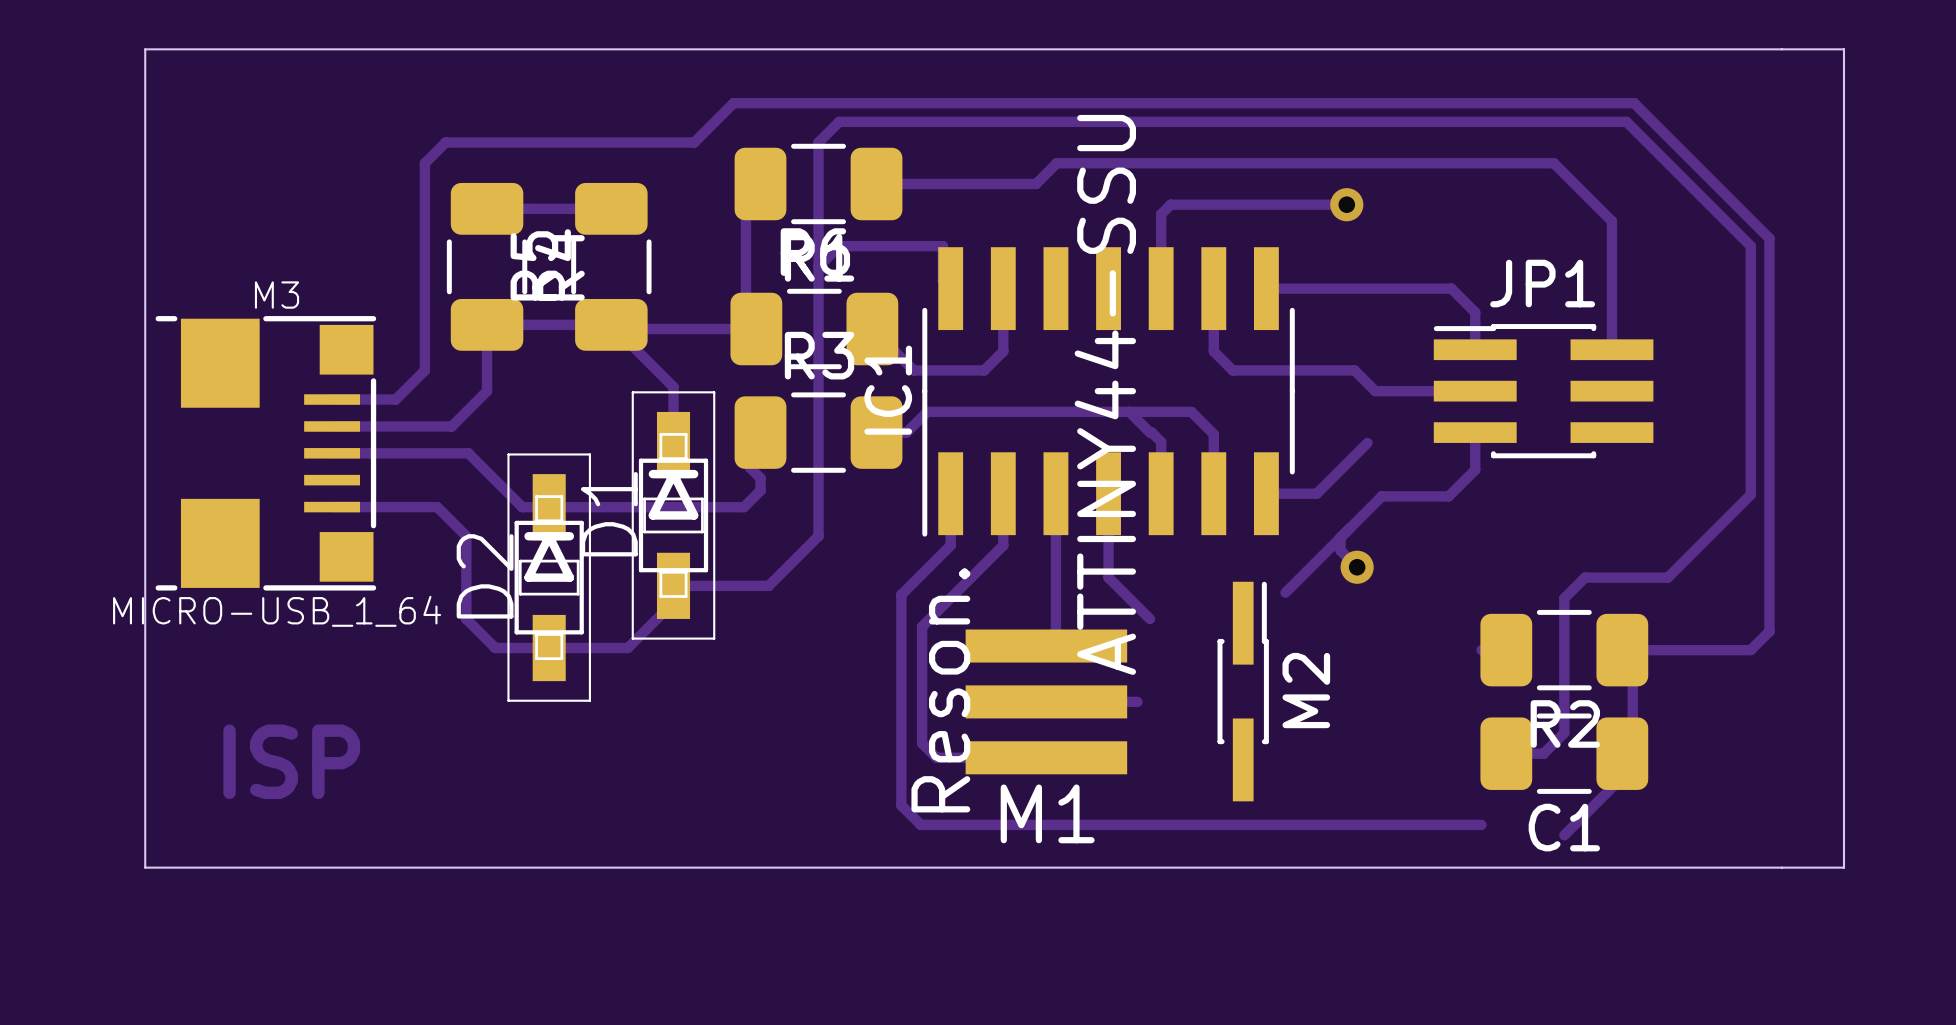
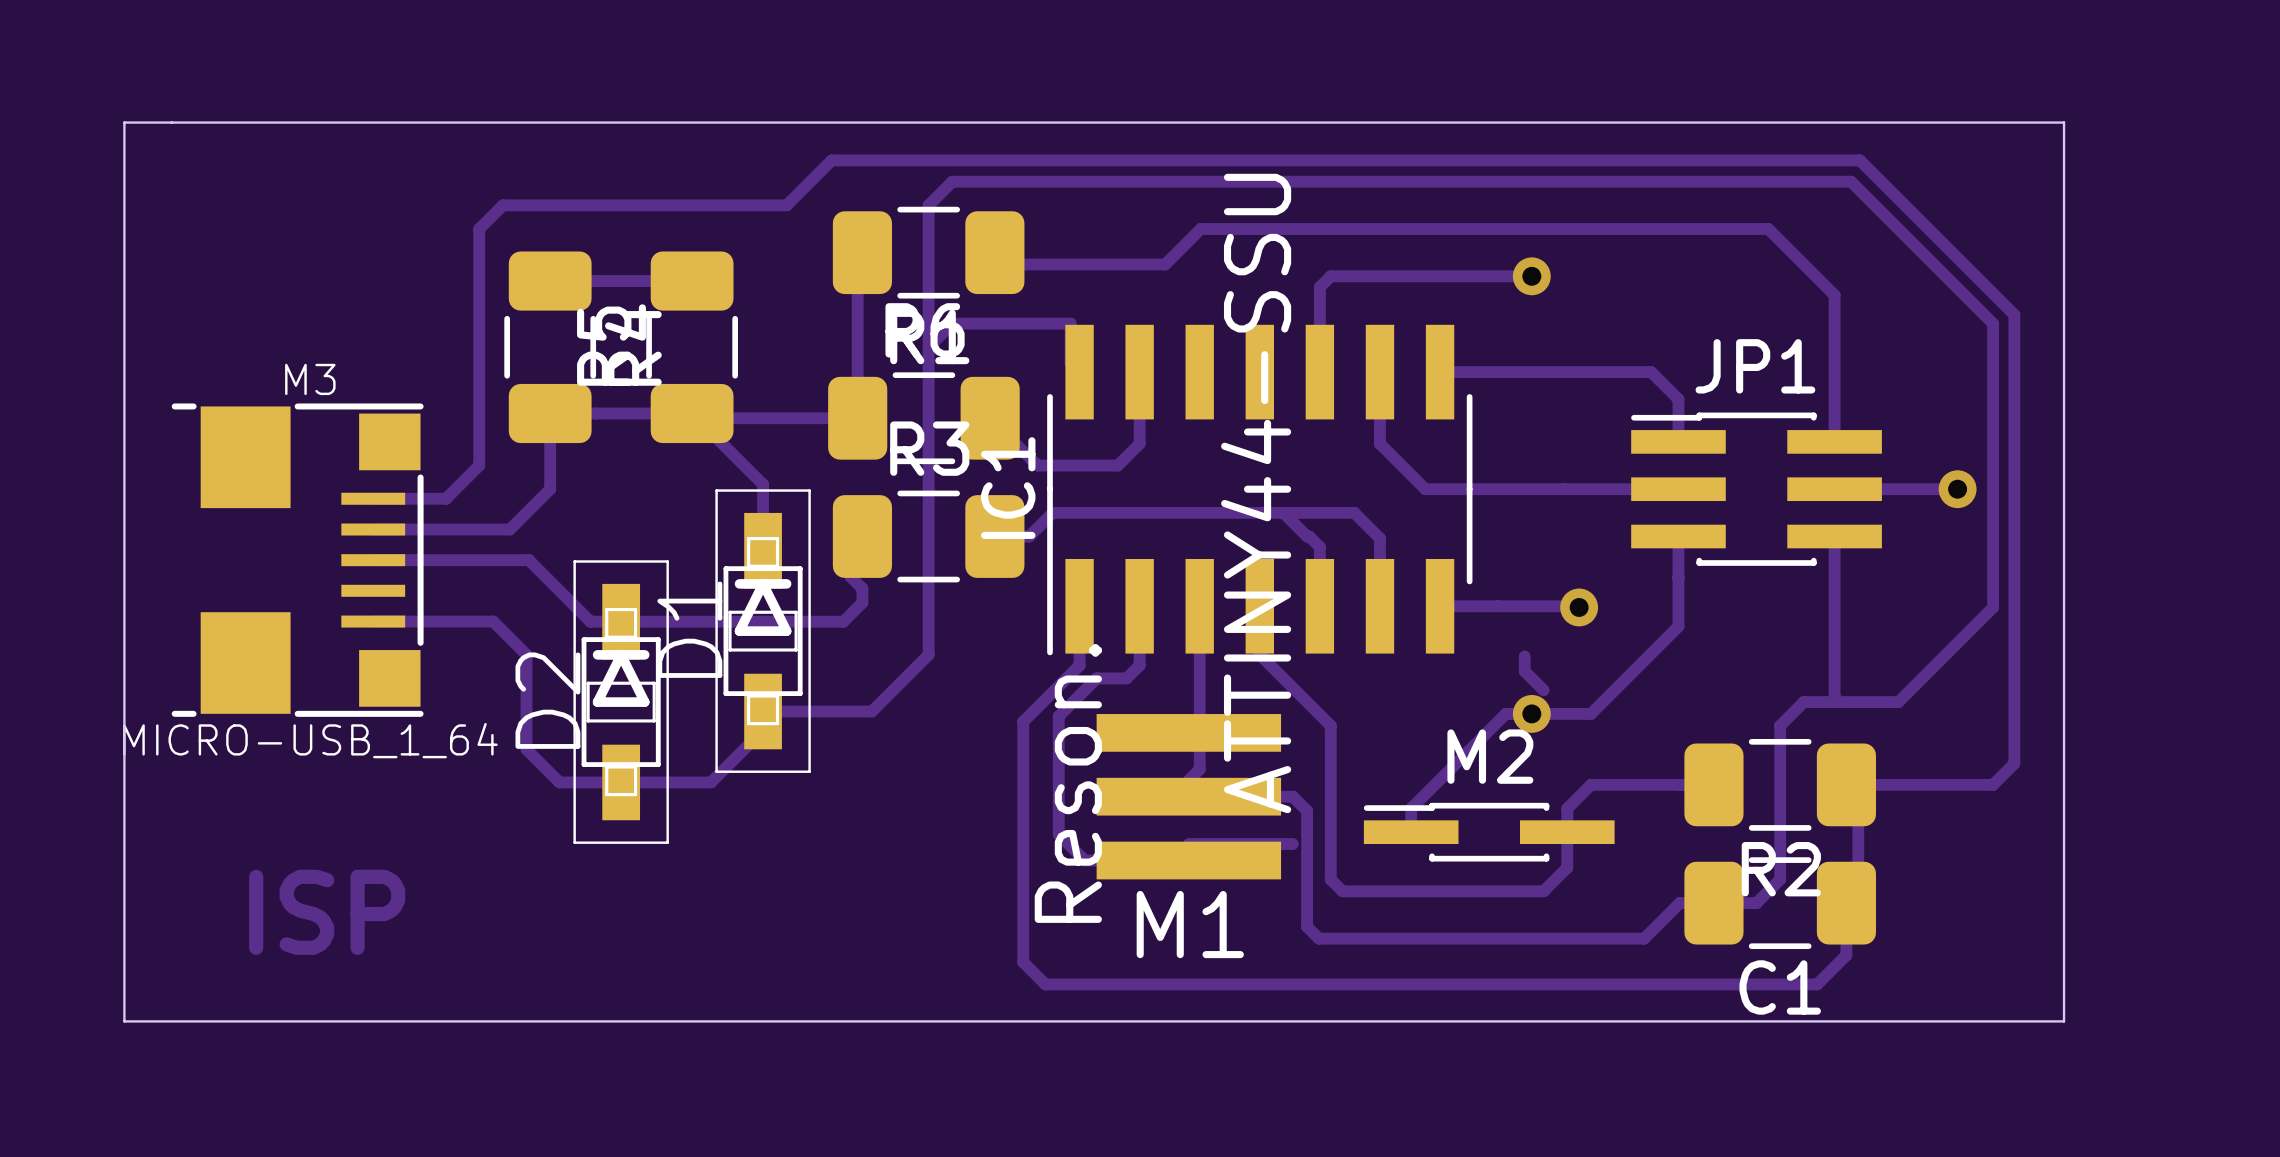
board edge: (145, 49) (145, 867) (1843, 867) (1843, 49) (145, 49) -> (124, 122) (124, 1021) (2064, 1021) (2064, 122) (124, 122)
track: (750, 183) (745, 188) (745, 329) -> none
track: (876, 183) (1036, 183) -> (1006, 264) (1165, 264) (1177, 252)
track: none -> (850, 264) (857, 271) (857, 418)
track: (1232, 370) (1354, 370) (1375, 391) -> (1401, 465) (1425, 489) (1564, 489)
track: none -> (1834, 489) (1957, 489)
via: none -> (1957, 489)
track: none -> (1834, 536) (1834, 697) (1839, 702)
track: (1367, 442) (1316, 493) -> (1579, 607) (1497, 606)
track: (1475, 469) (1448, 496) (1381, 496) (1285, 592) -> (1678, 579) (1678, 626) (1590, 713) (1505, 713) (1411, 808) (1411, 832)
via: none -> (1579, 607)
track: (1108, 536) (1108, 577) (1149, 619) -> (1259, 654) (1330, 725) (1330, 879) (1342, 891) (1543, 891) (1567, 867) (1567, 808) (1590, 784) (1685, 784)
track: (991, 556) (922, 626) (922, 743) (936, 757) (1046, 757) -> (1126, 678) (1096, 678) (1058, 716) (1058, 834) (1084, 860) (1188, 860)
via position: (1357, 567) -> (1531, 713)
track: none -> (1188, 796) (1292, 796) (1307, 810) (1307, 926) (1318, 938) (1644, 938) (1679, 903) (1702, 903)
M2 rotation: 0° (1243, 691) -> 90° counterclockwise (1489, 832)
M1 position: (1046, 701) -> (1188, 796)
track: none -> (1846, 903) (1846, 955) (1817, 984) (1685, 984)
track: (1632, 766) (1564, 835) -> none

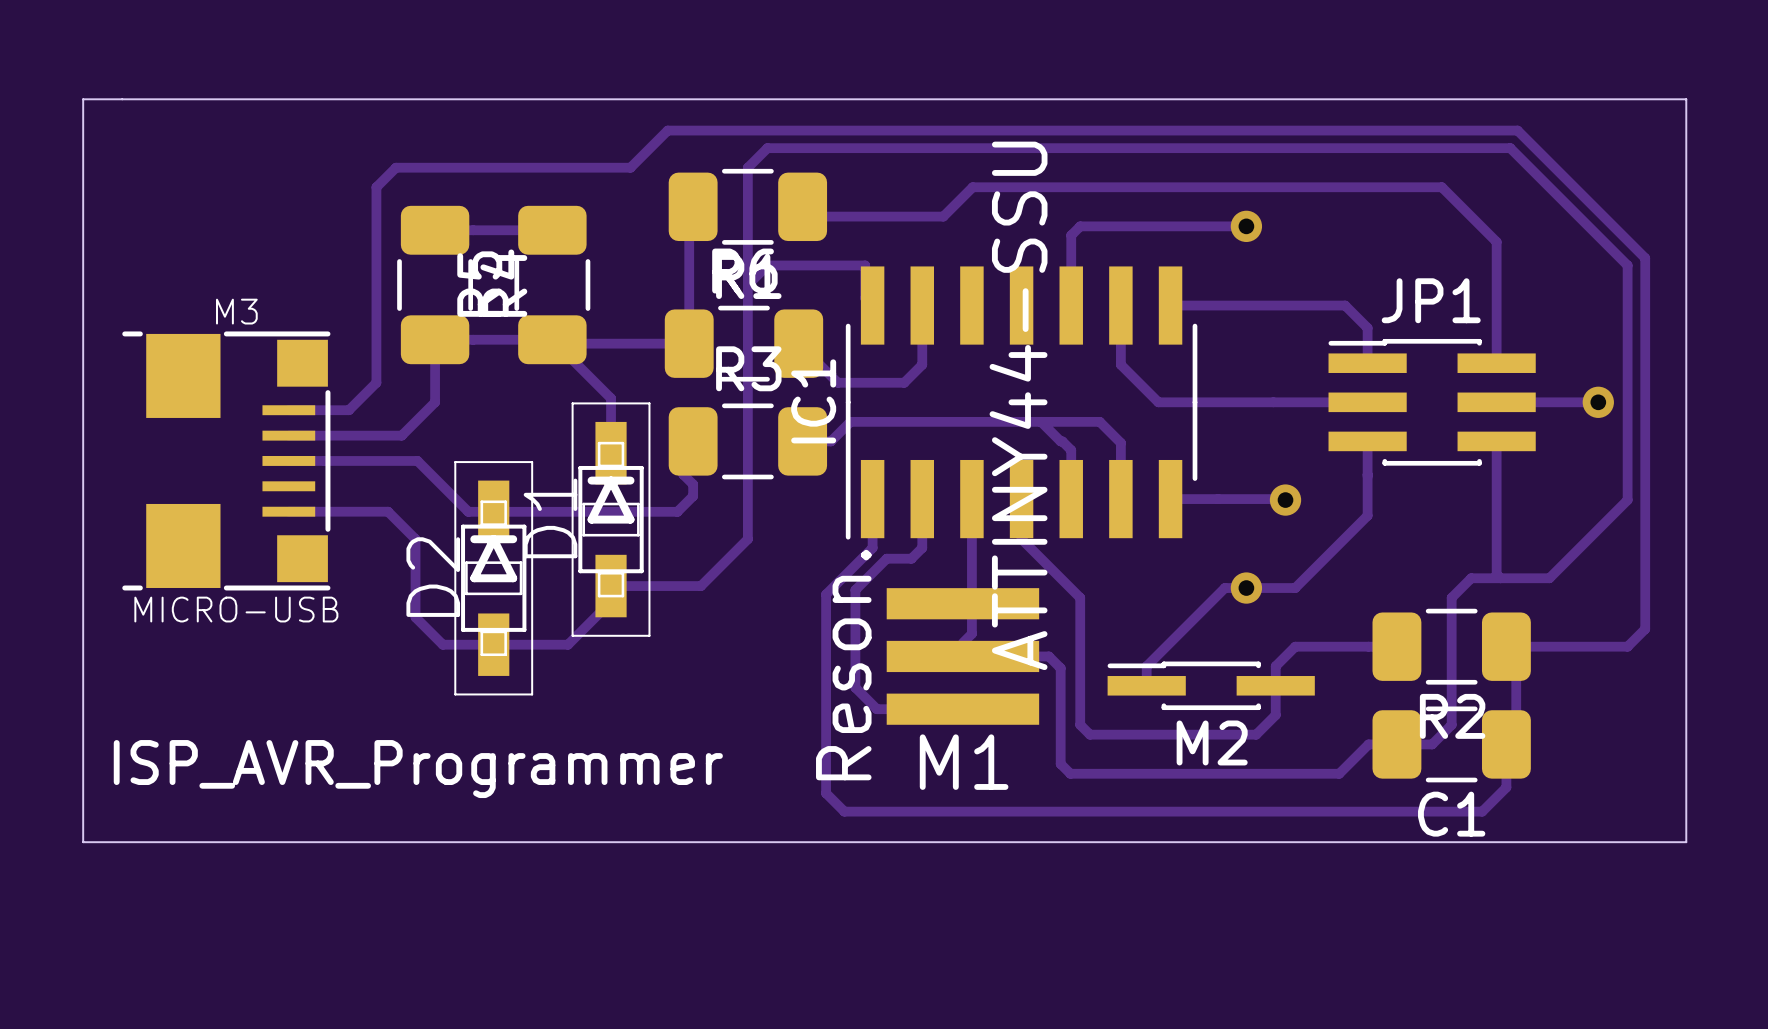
track: (1524, 656) (1524, 671) (1543, 690) -> none
M3 value: MICRO-USB_1_64 (310, 740) -> MICRO-USB (236, 609)
M2 name position: M2 (1490, 756) -> M2 (1212, 742)
M1 value position: Reson. (1068, 783) -> Reson. (843, 665)
track: (1188, 844) (1292, 844) -> none
text: ISP (327, 912) -> none
text: none -> ISP_AVR_Programmer (418, 769)

